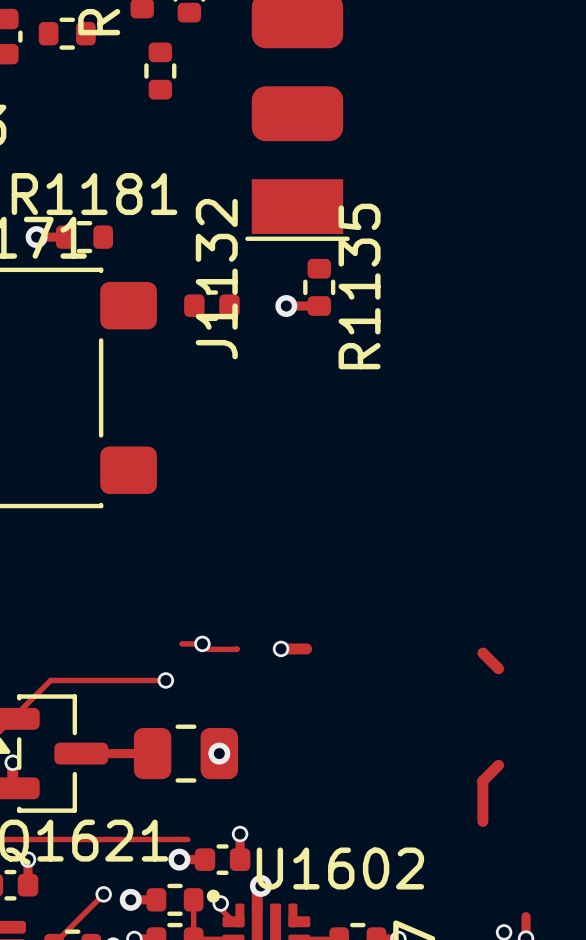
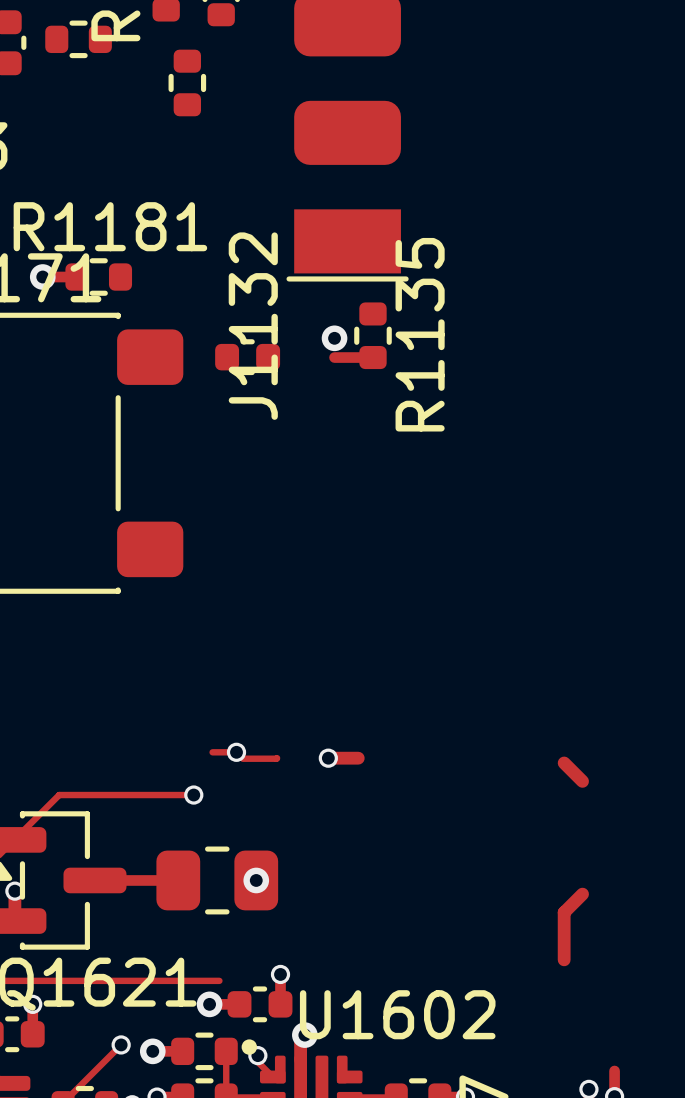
via position: (286, 306) -> (334, 338)

